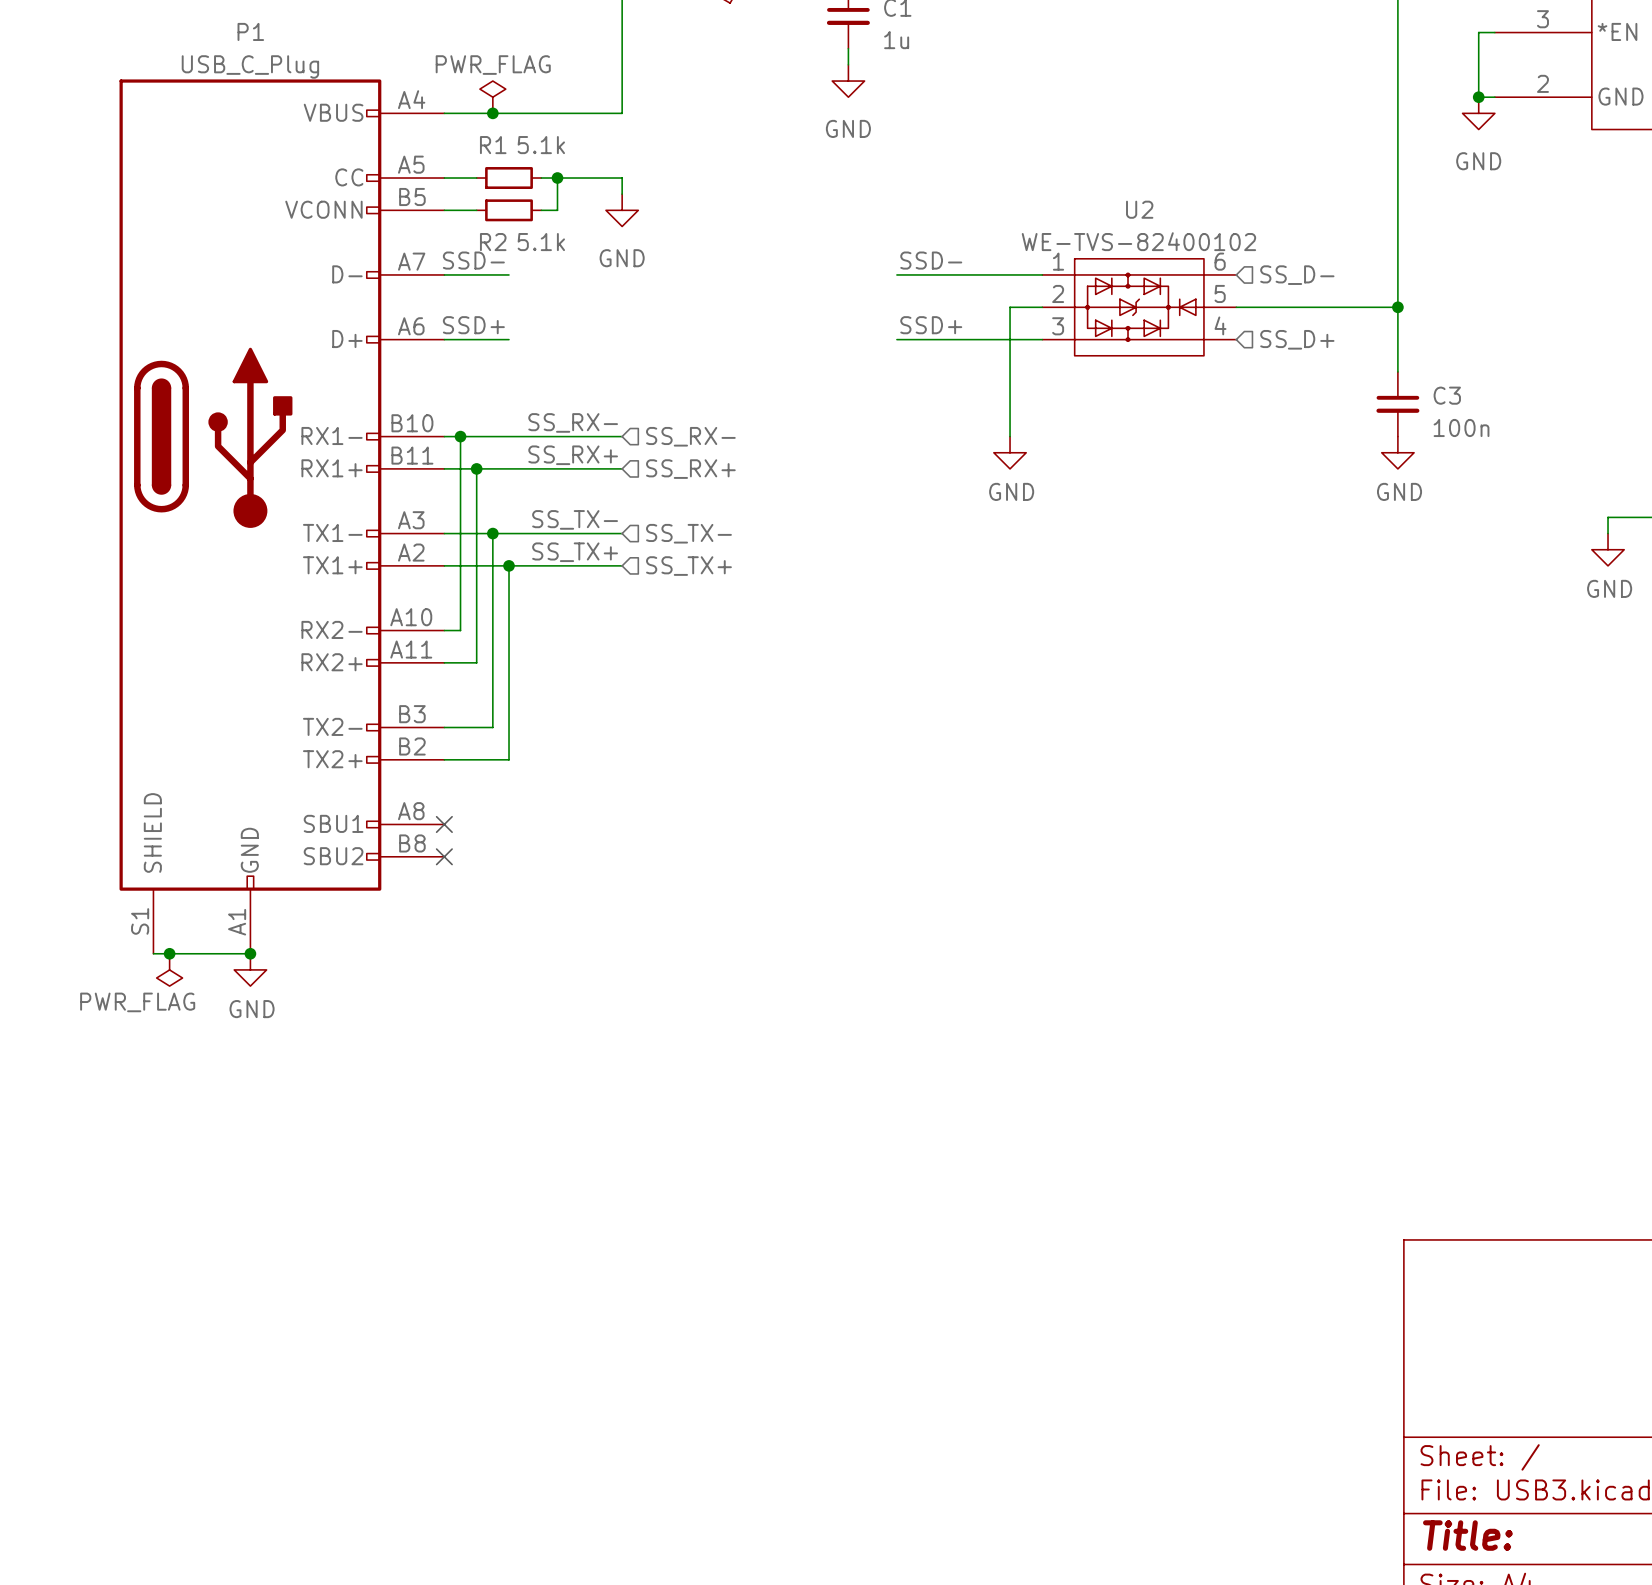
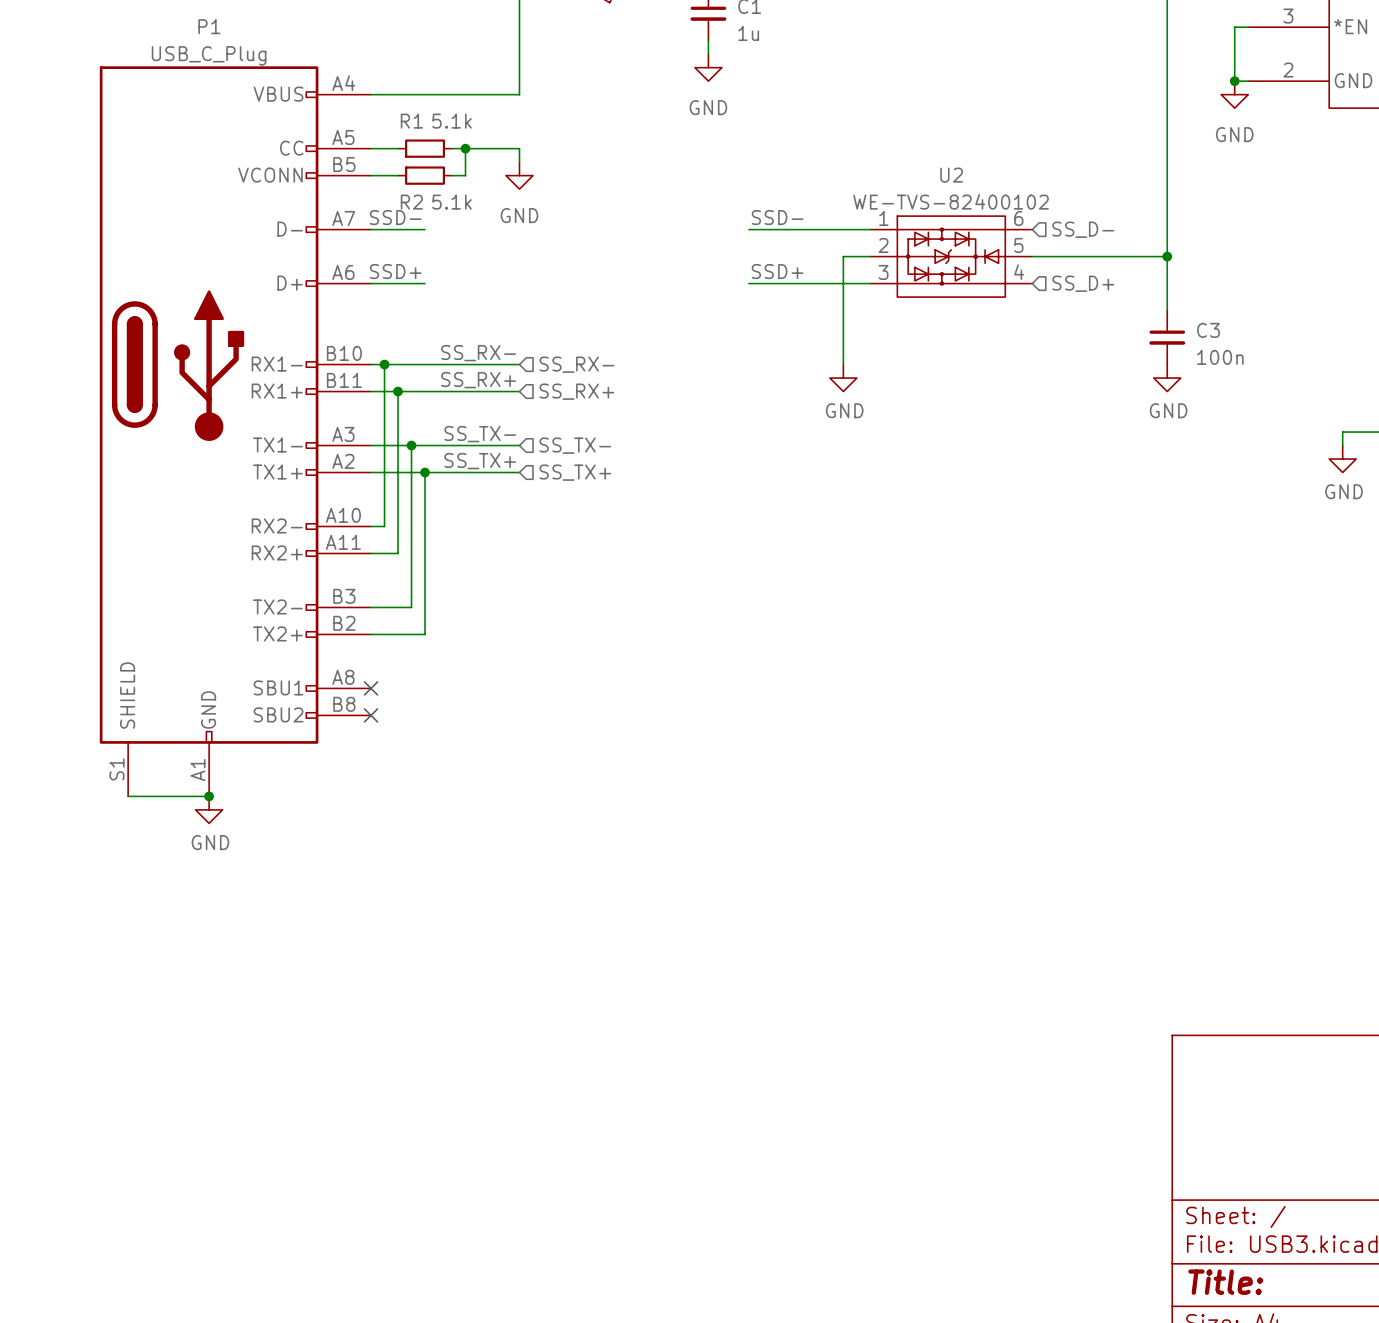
power symbol: PWR_FLAG (492, 97) -> none
junction: (492, 113) -> none
junction: (169, 953) -> none
power symbol: PWR_FLAG (169, 969) -> none

